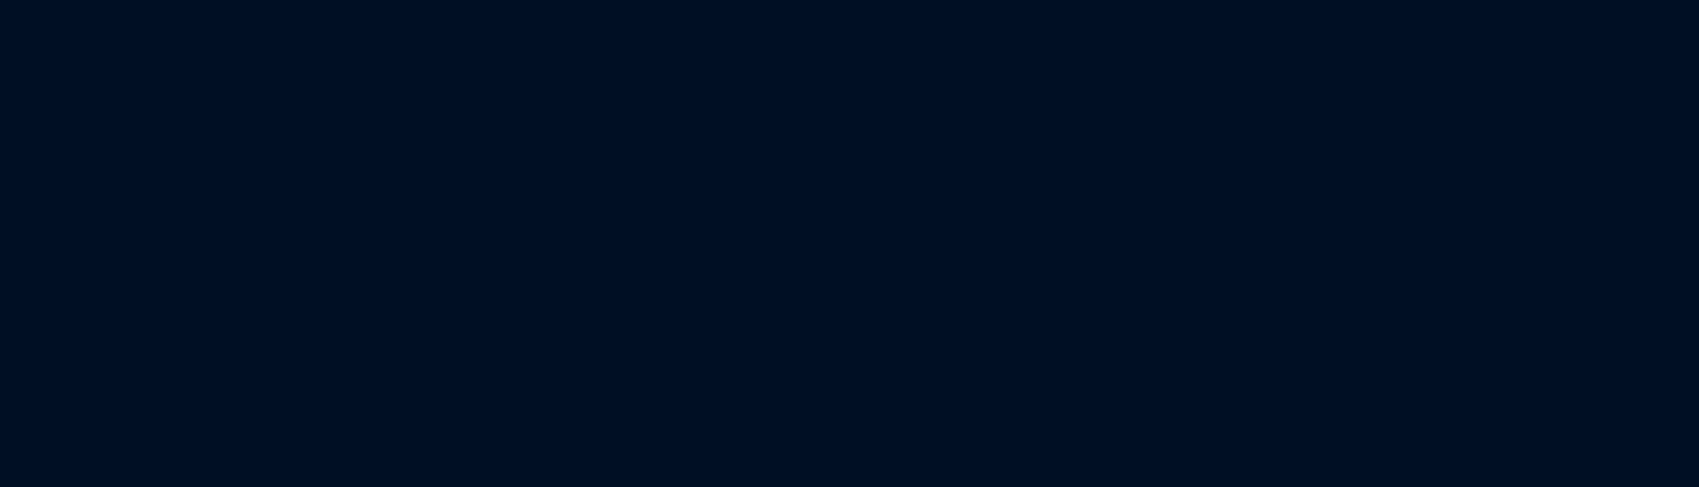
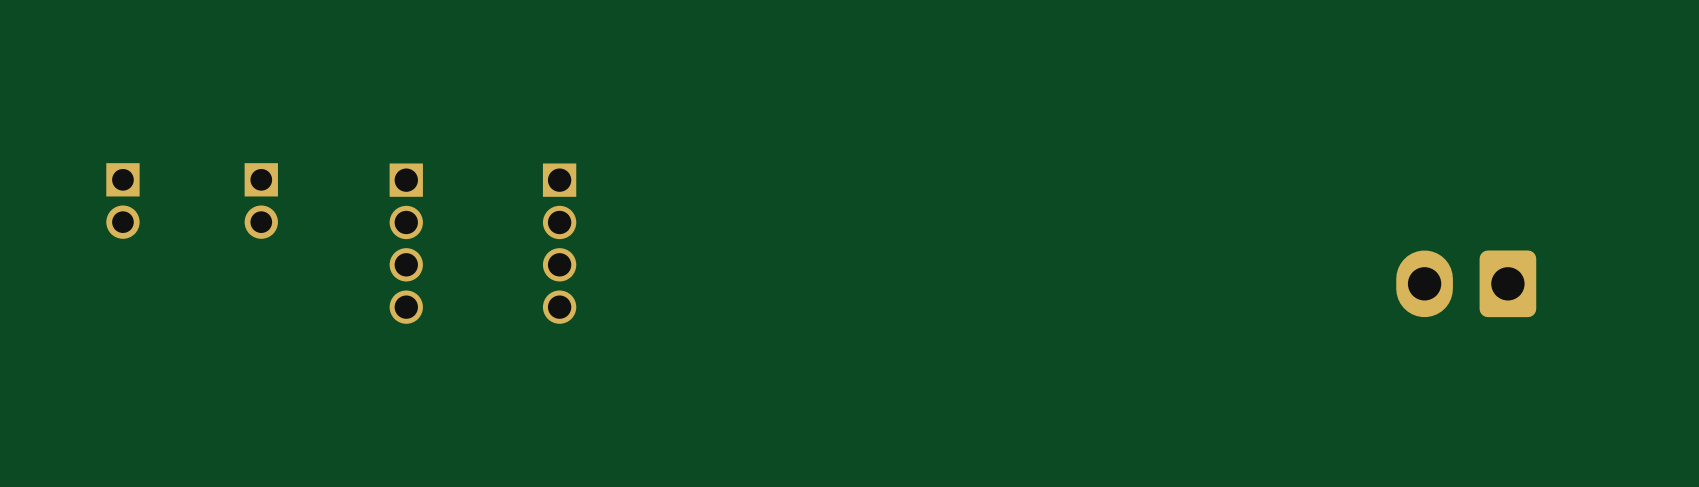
part: none -> (122, 200)
part: none -> (261, 200)
part: none -> (406, 243)
part: none -> (559, 243)
part: none -> (1466, 283)

